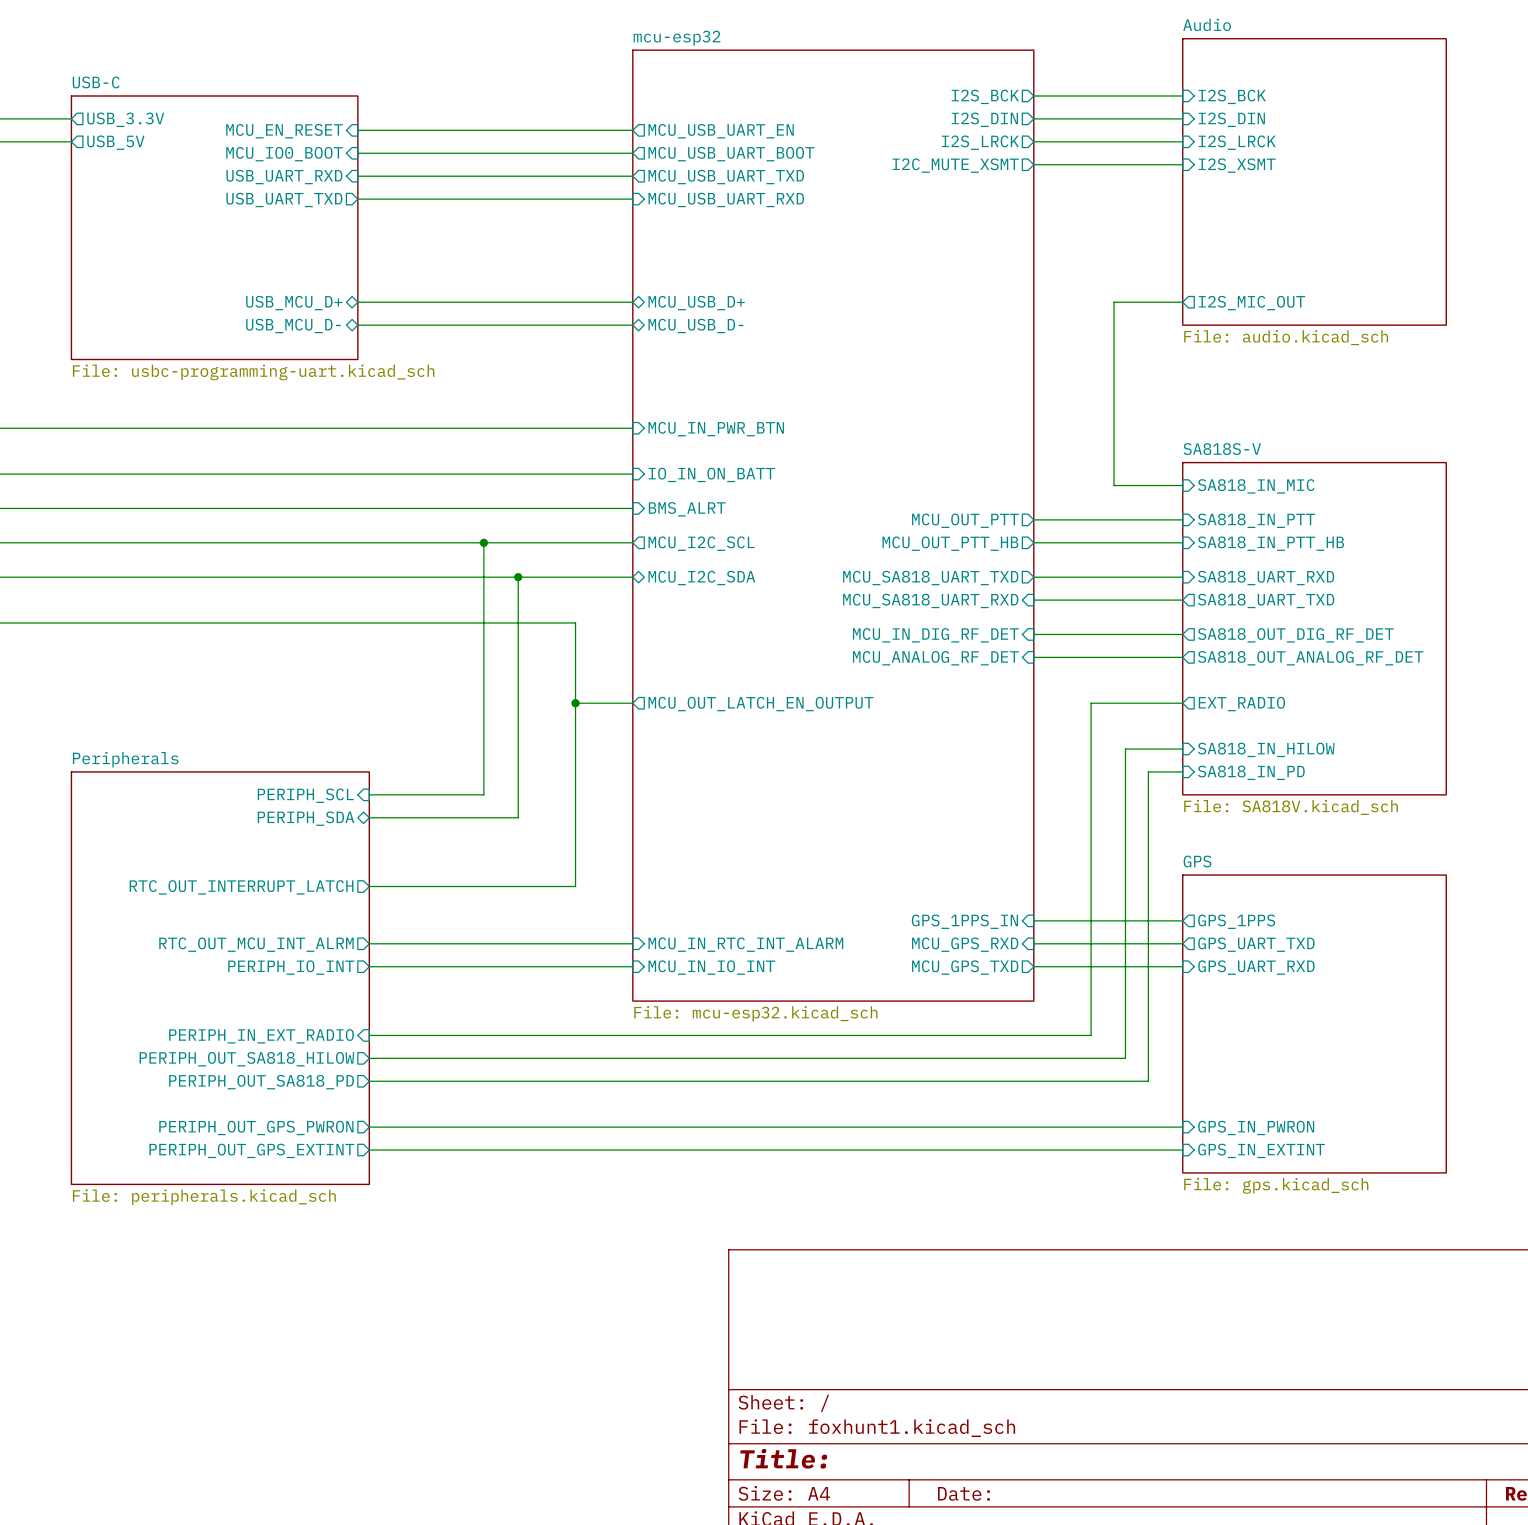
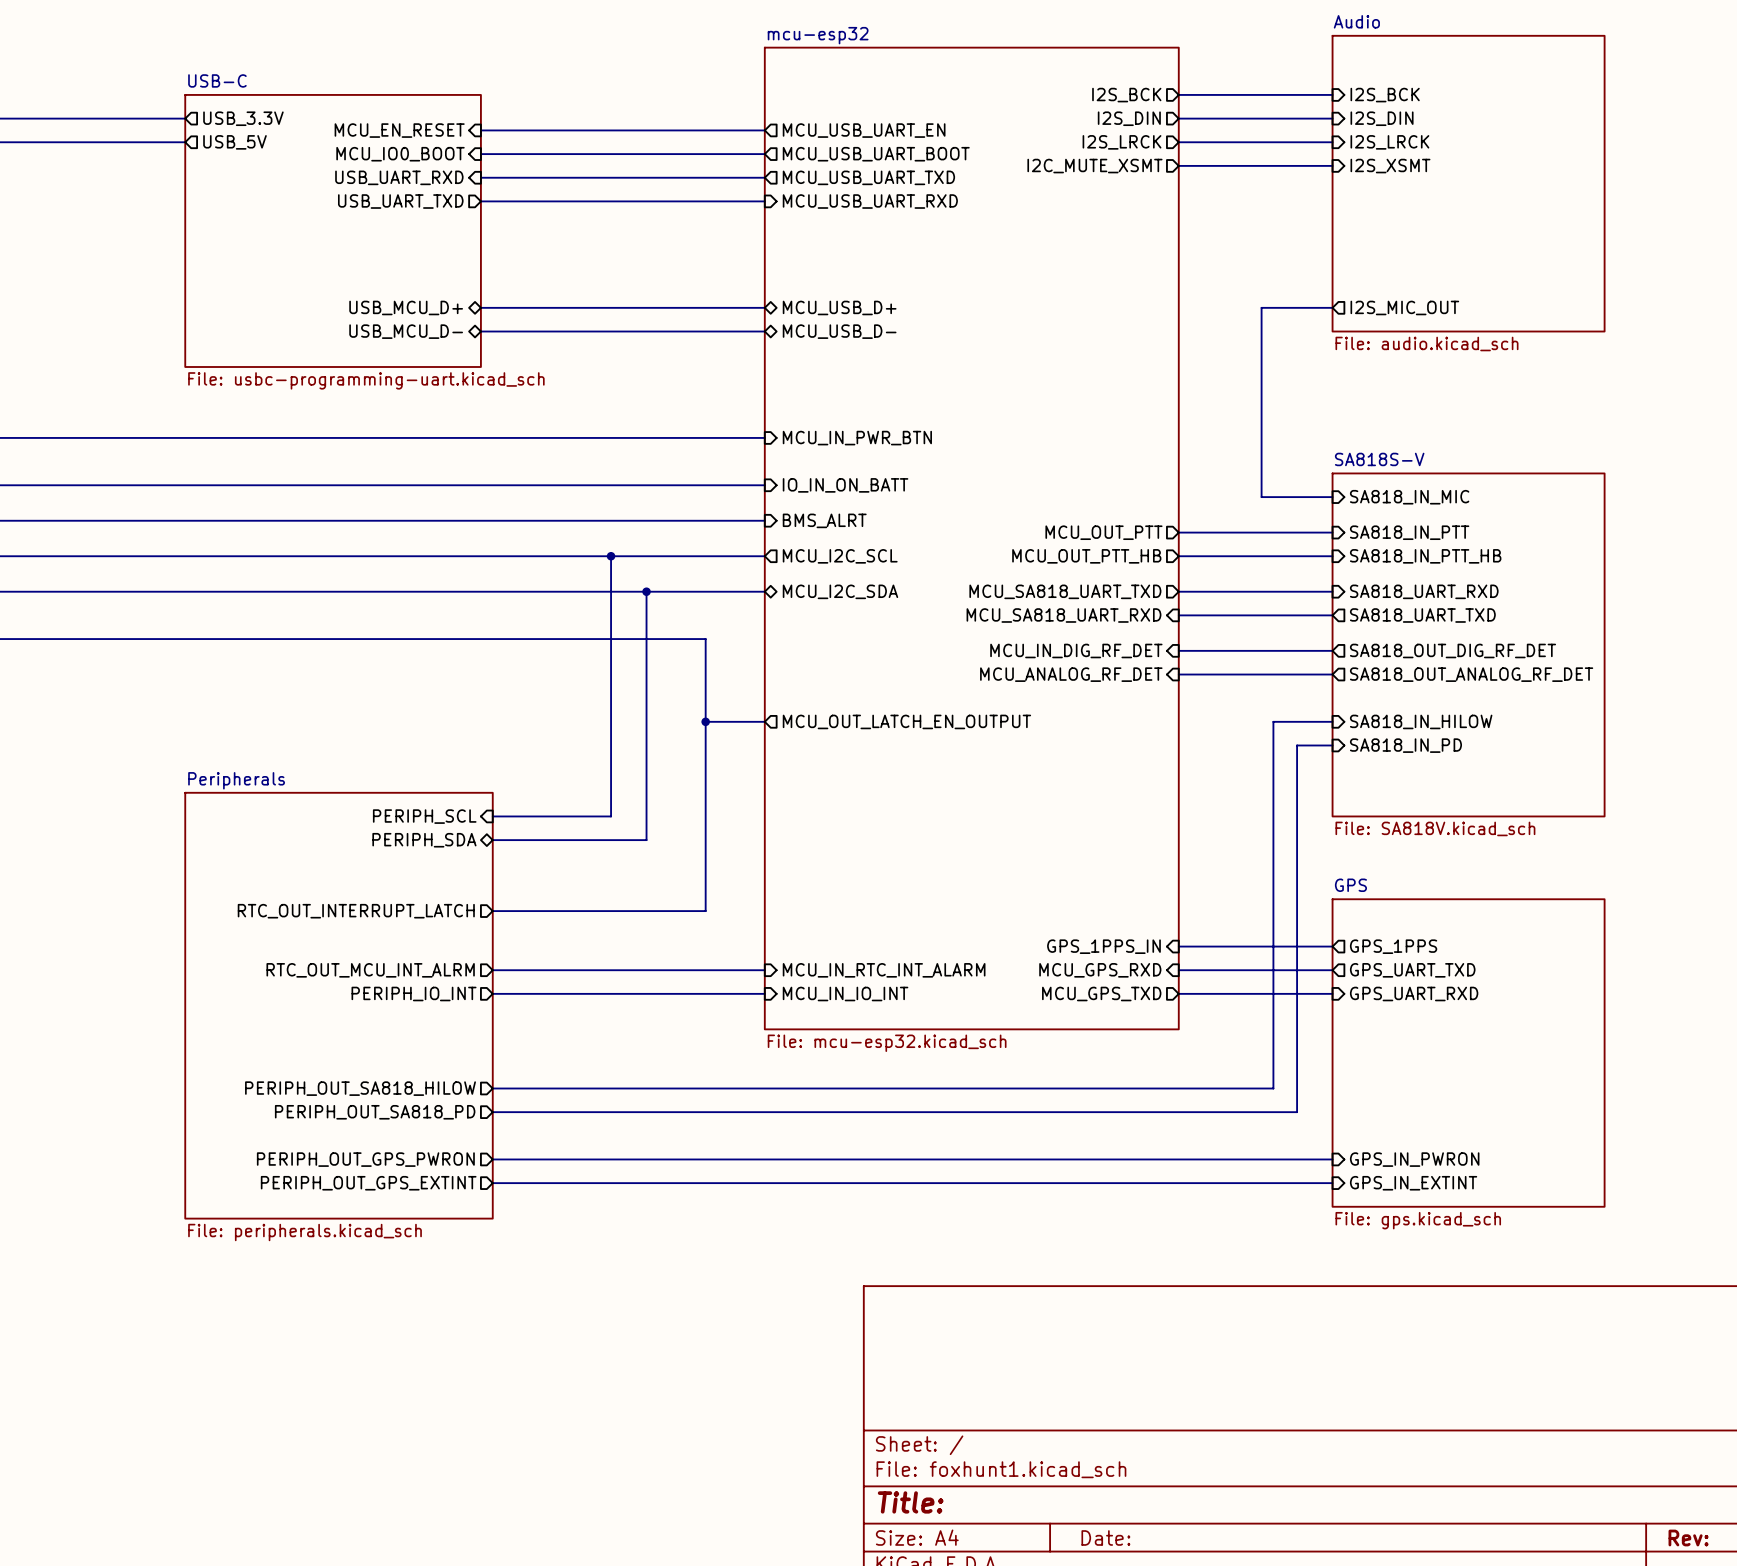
wire: (1125, 703) (1091, 703) (1091, 1035) (369, 1035) -> none
sheet pin shape: output (1241, 704) -> input (1421, 721)
sheet pin: EXT_RADIO (1241, 704) -> SA818_IN_HILOW (1421, 721)
wire: (1125, 749) (1182, 749) -> (1273, 769) (1273, 721)
sheet pin: SA818_IN_HILOW (1266, 749) -> none
wire: (1148, 771) (1182, 771) -> (1297, 792) (1297, 745) (1332, 745)
sheet pin position: SA818_IN_PD (1251, 772) -> SA818_IN_PD (1405, 745)
sheet pin: PERIPH_IN_EXT_RADIO (261, 1036) -> none

